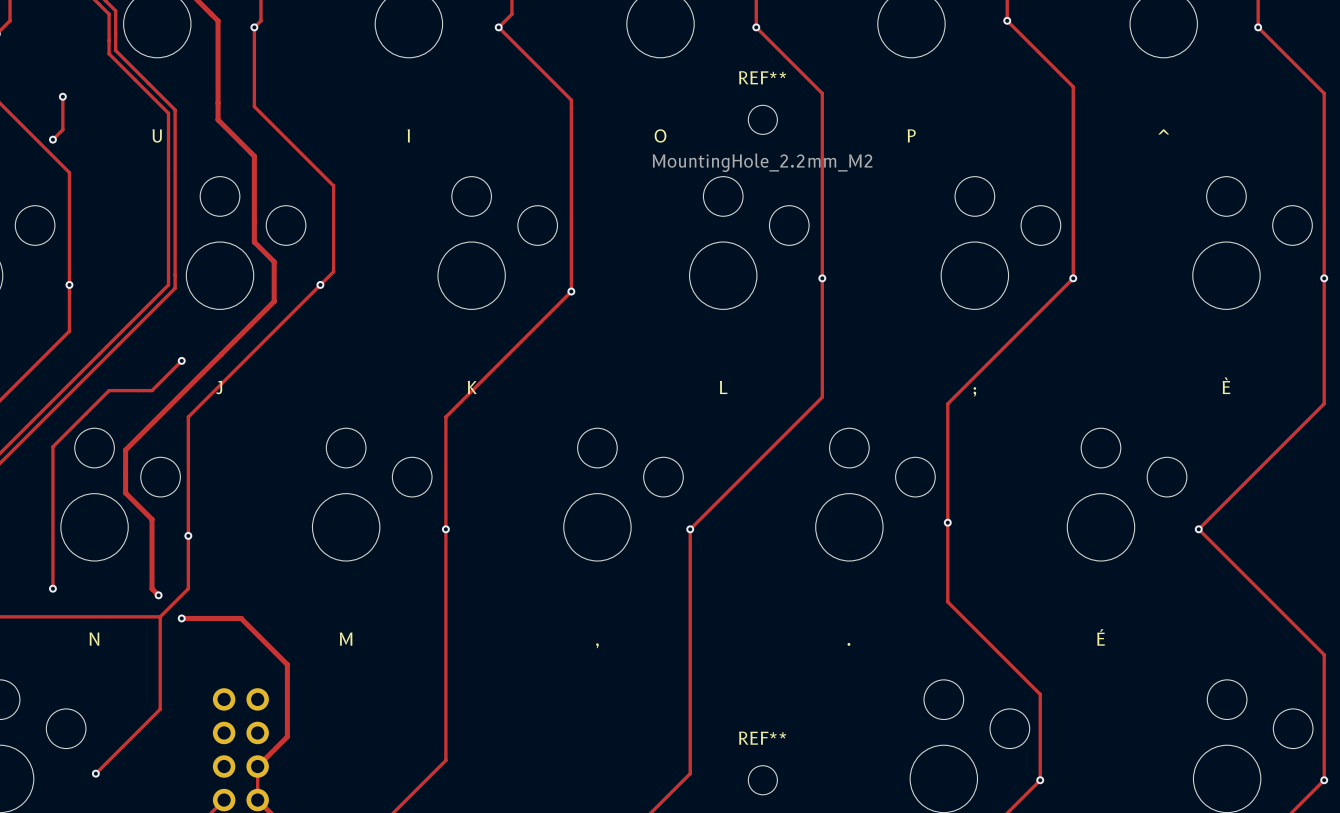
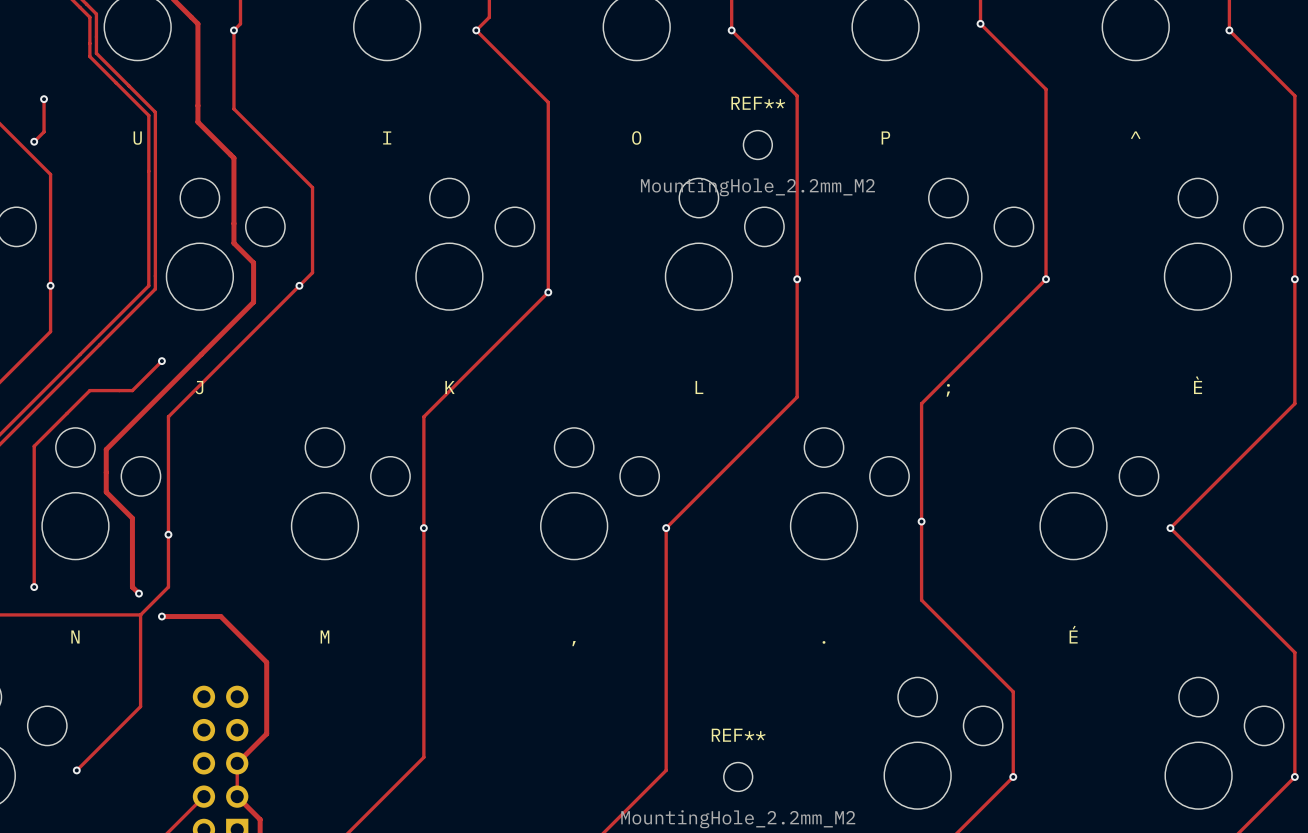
REF** position: (762, 119) -> (757, 145)

